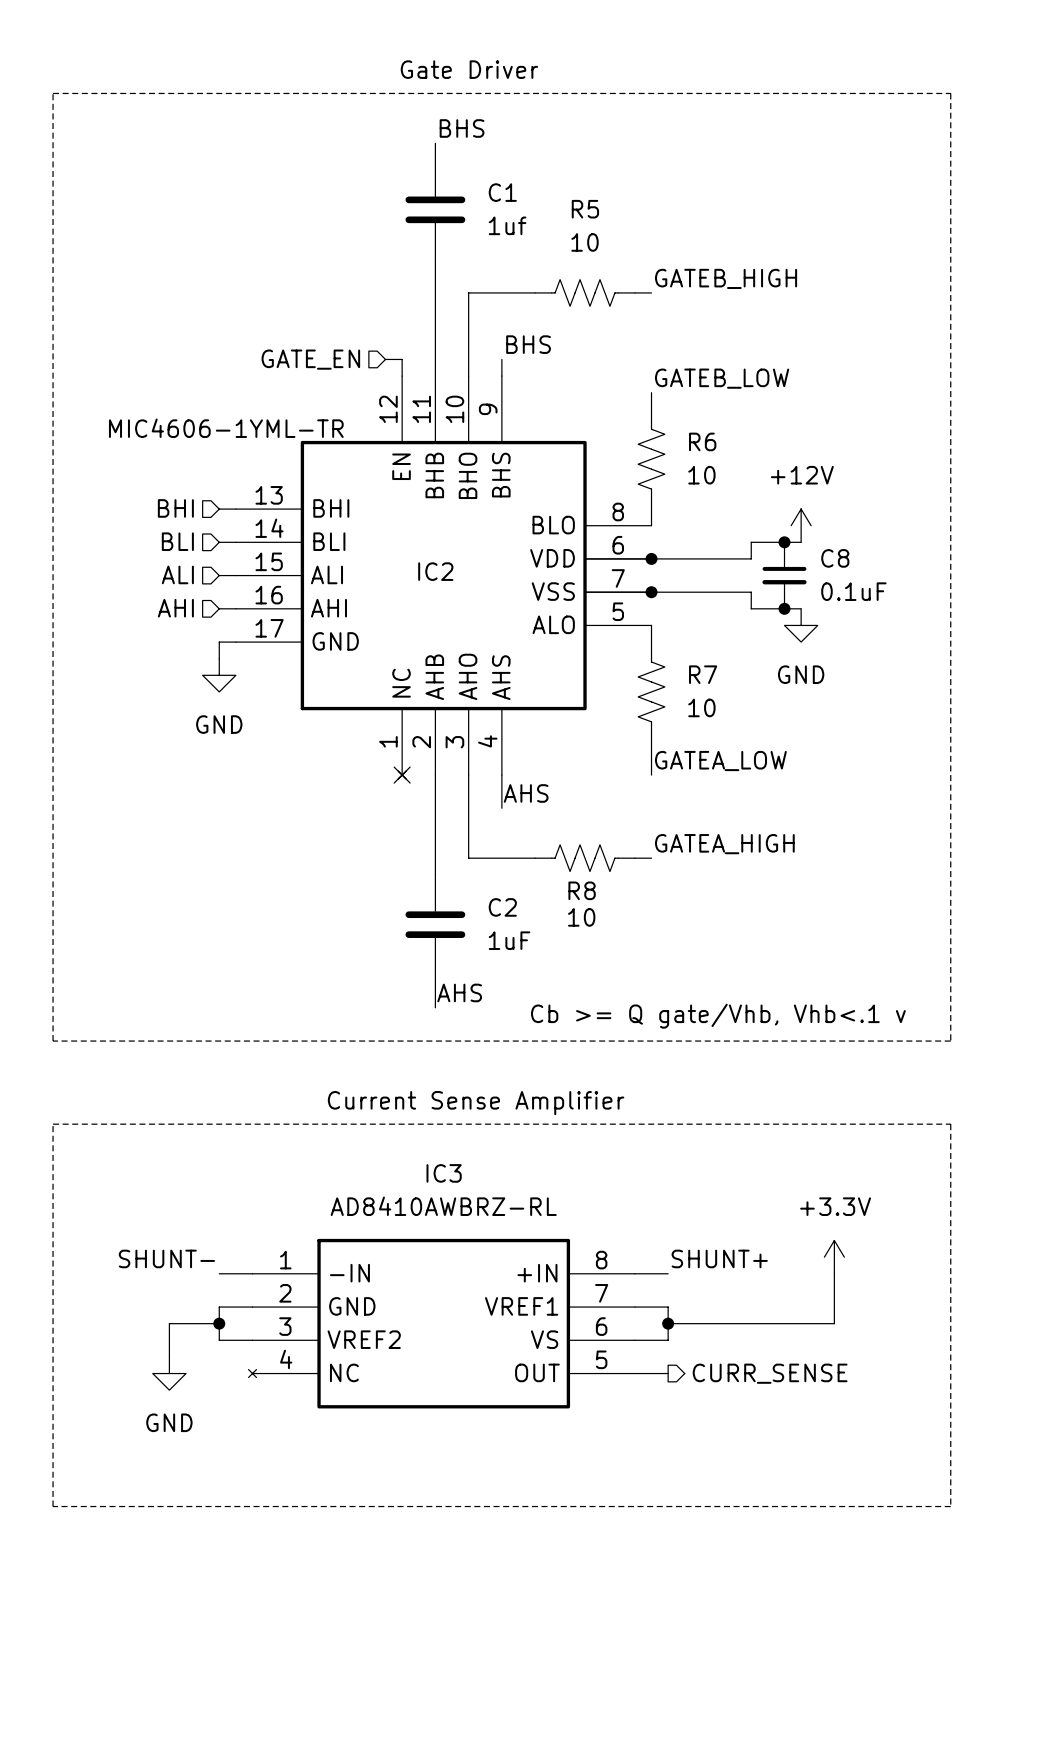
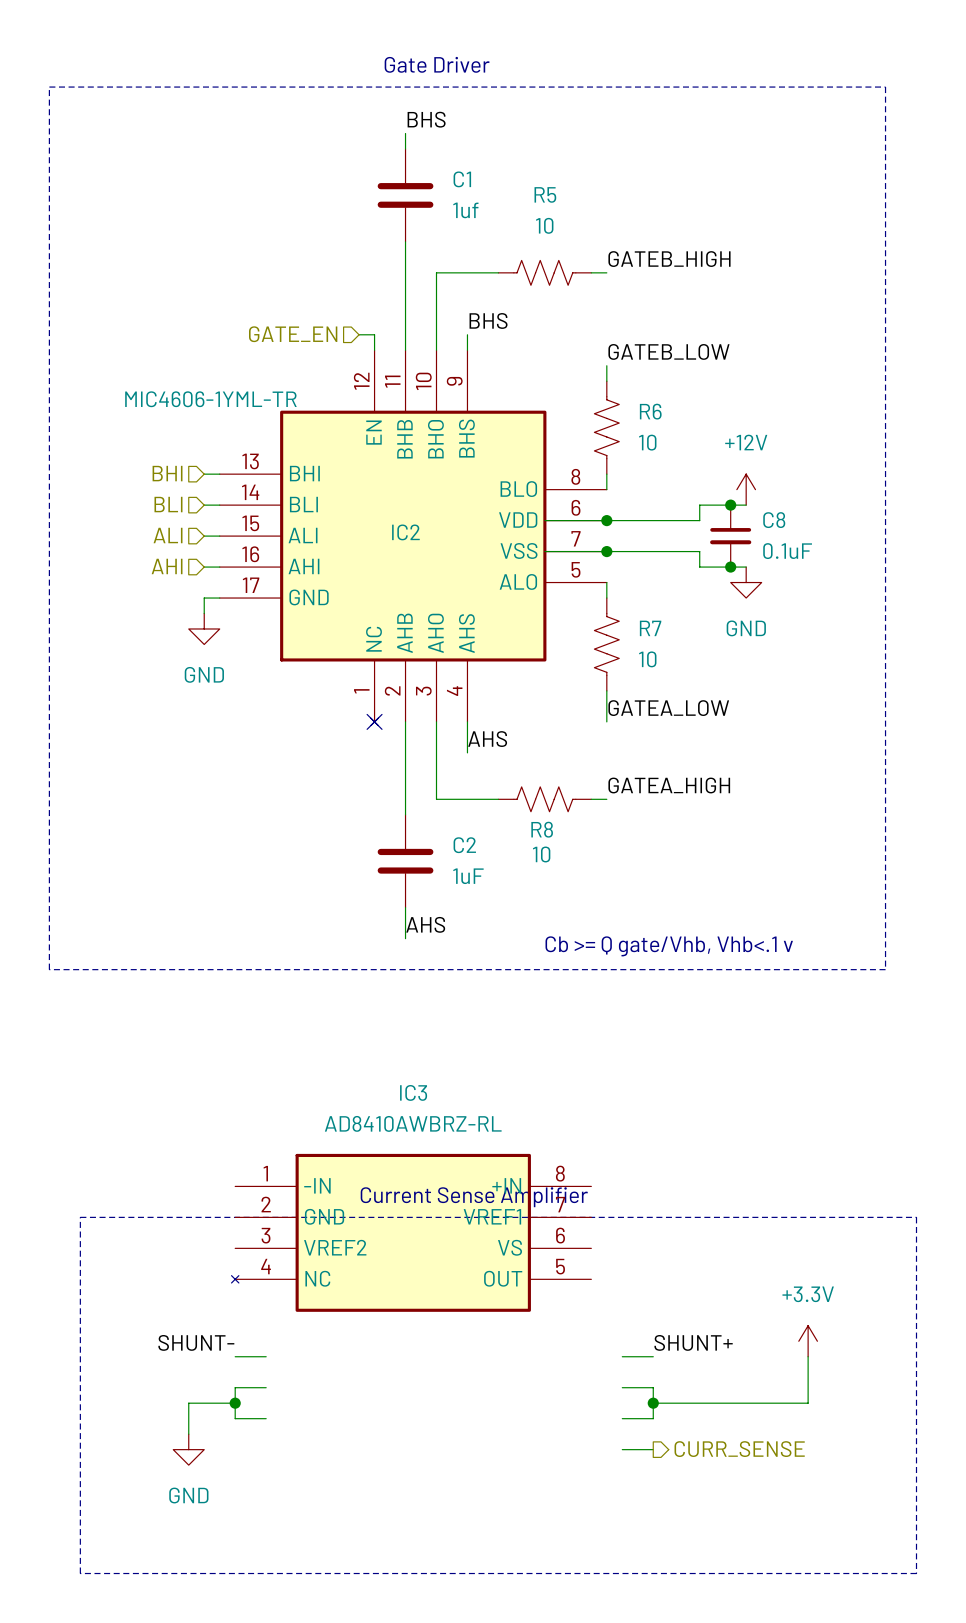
text position: Current Sense Amplifier (476, 1103) -> Current Sense Amplifier (474, 1197)
line: (53, 1124) (950, 1124) (950, 1506) (53, 1506) (53, 1124) -> (80, 1217) (916, 1217) (916, 1573) (80, 1573) (80, 1217)
power symbol position: +3.3V (834, 1257) -> +3.3V (808, 1341)
label position: SHUNT- (166, 1258) -> SHUNT- (196, 1342)
label position: SHUNT+ (719, 1258) -> SHUNT+ (693, 1342)
wire: (219, 1273) (252, 1273) -> (235, 1356) (266, 1356)
wire: (634, 1273) (668, 1273) -> (622, 1356) (653, 1356)
wire: (834, 1273) (834, 1323) (668, 1323) -> (808, 1356) (808, 1403) (653, 1403)
wire: (252, 1307) (219, 1307) (219, 1340) (252, 1340) -> (266, 1387) (235, 1387) (235, 1418) (266, 1418)
wire: (634, 1307) (668, 1307) (668, 1340) (634, 1340) -> (622, 1387) (653, 1387) (653, 1418) (622, 1418)
wire: (219, 1323) (169, 1323) (169, 1356) -> (235, 1403) (188, 1403) (188, 1434)
junction: (219, 1323) -> none
junction: (668, 1323) -> none
power symbol position: GND (169, 1373) -> GND (188, 1449)
wire: (634, 1373) (668, 1373) -> (622, 1449) (653, 1449)
hierarchical label position: CURR_SENSE (770, 1373) -> CURR_SENSE (739, 1449)
junction: none -> (235, 1403)
junction: none -> (653, 1403)

